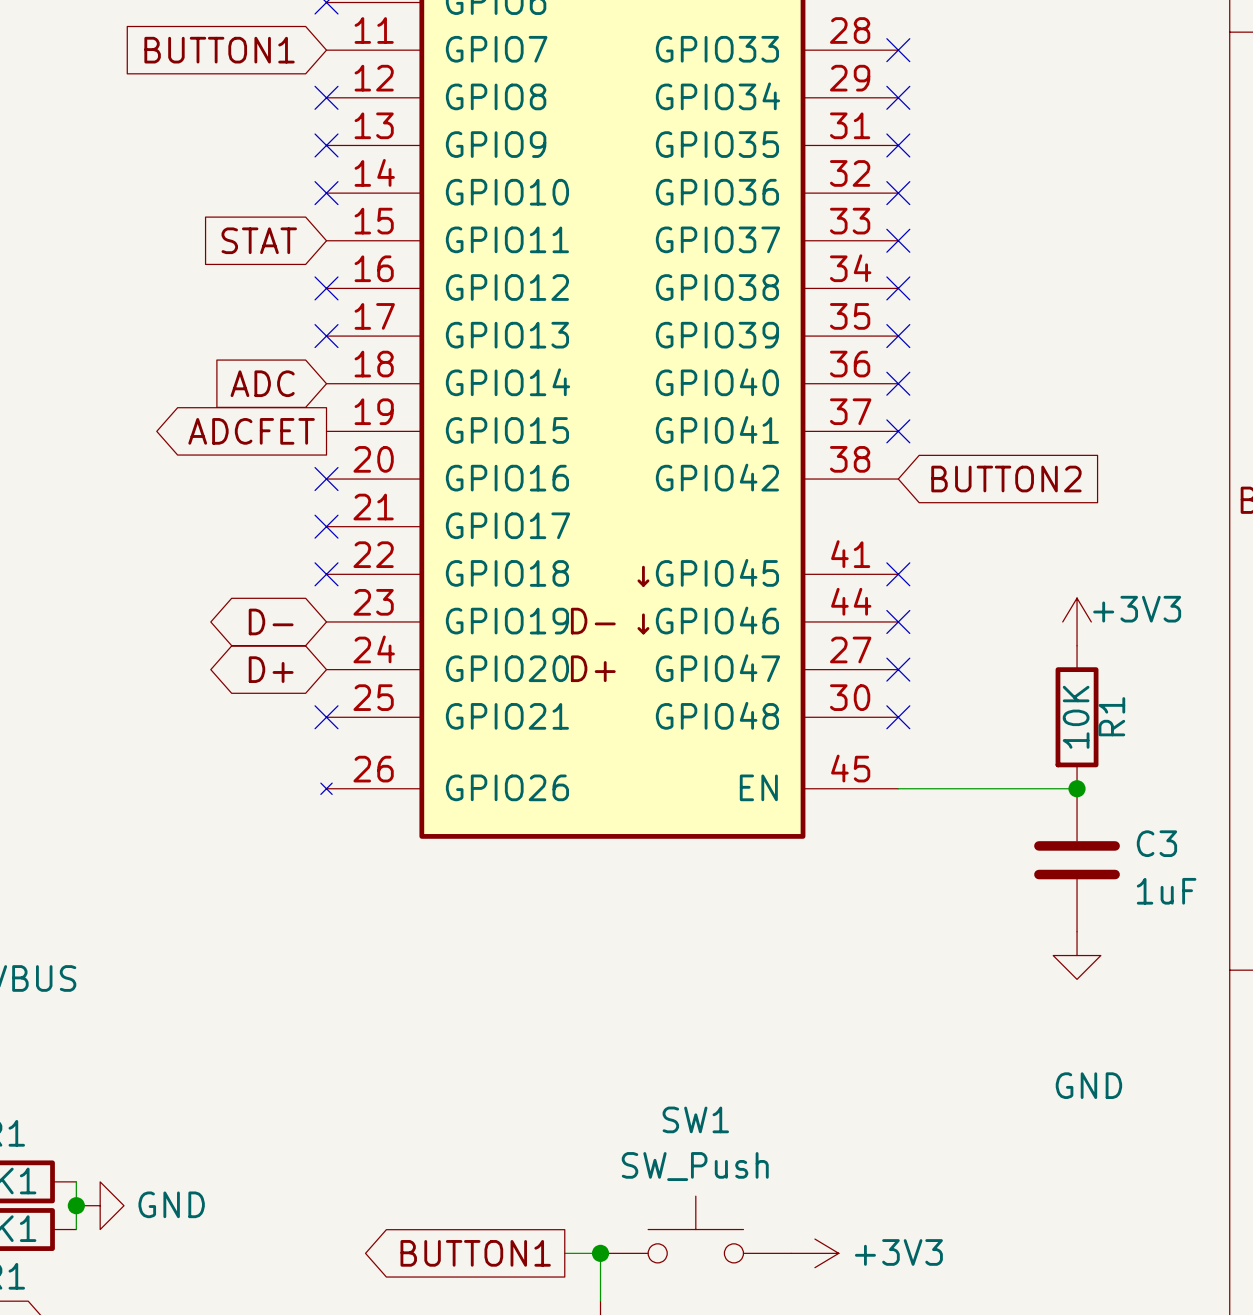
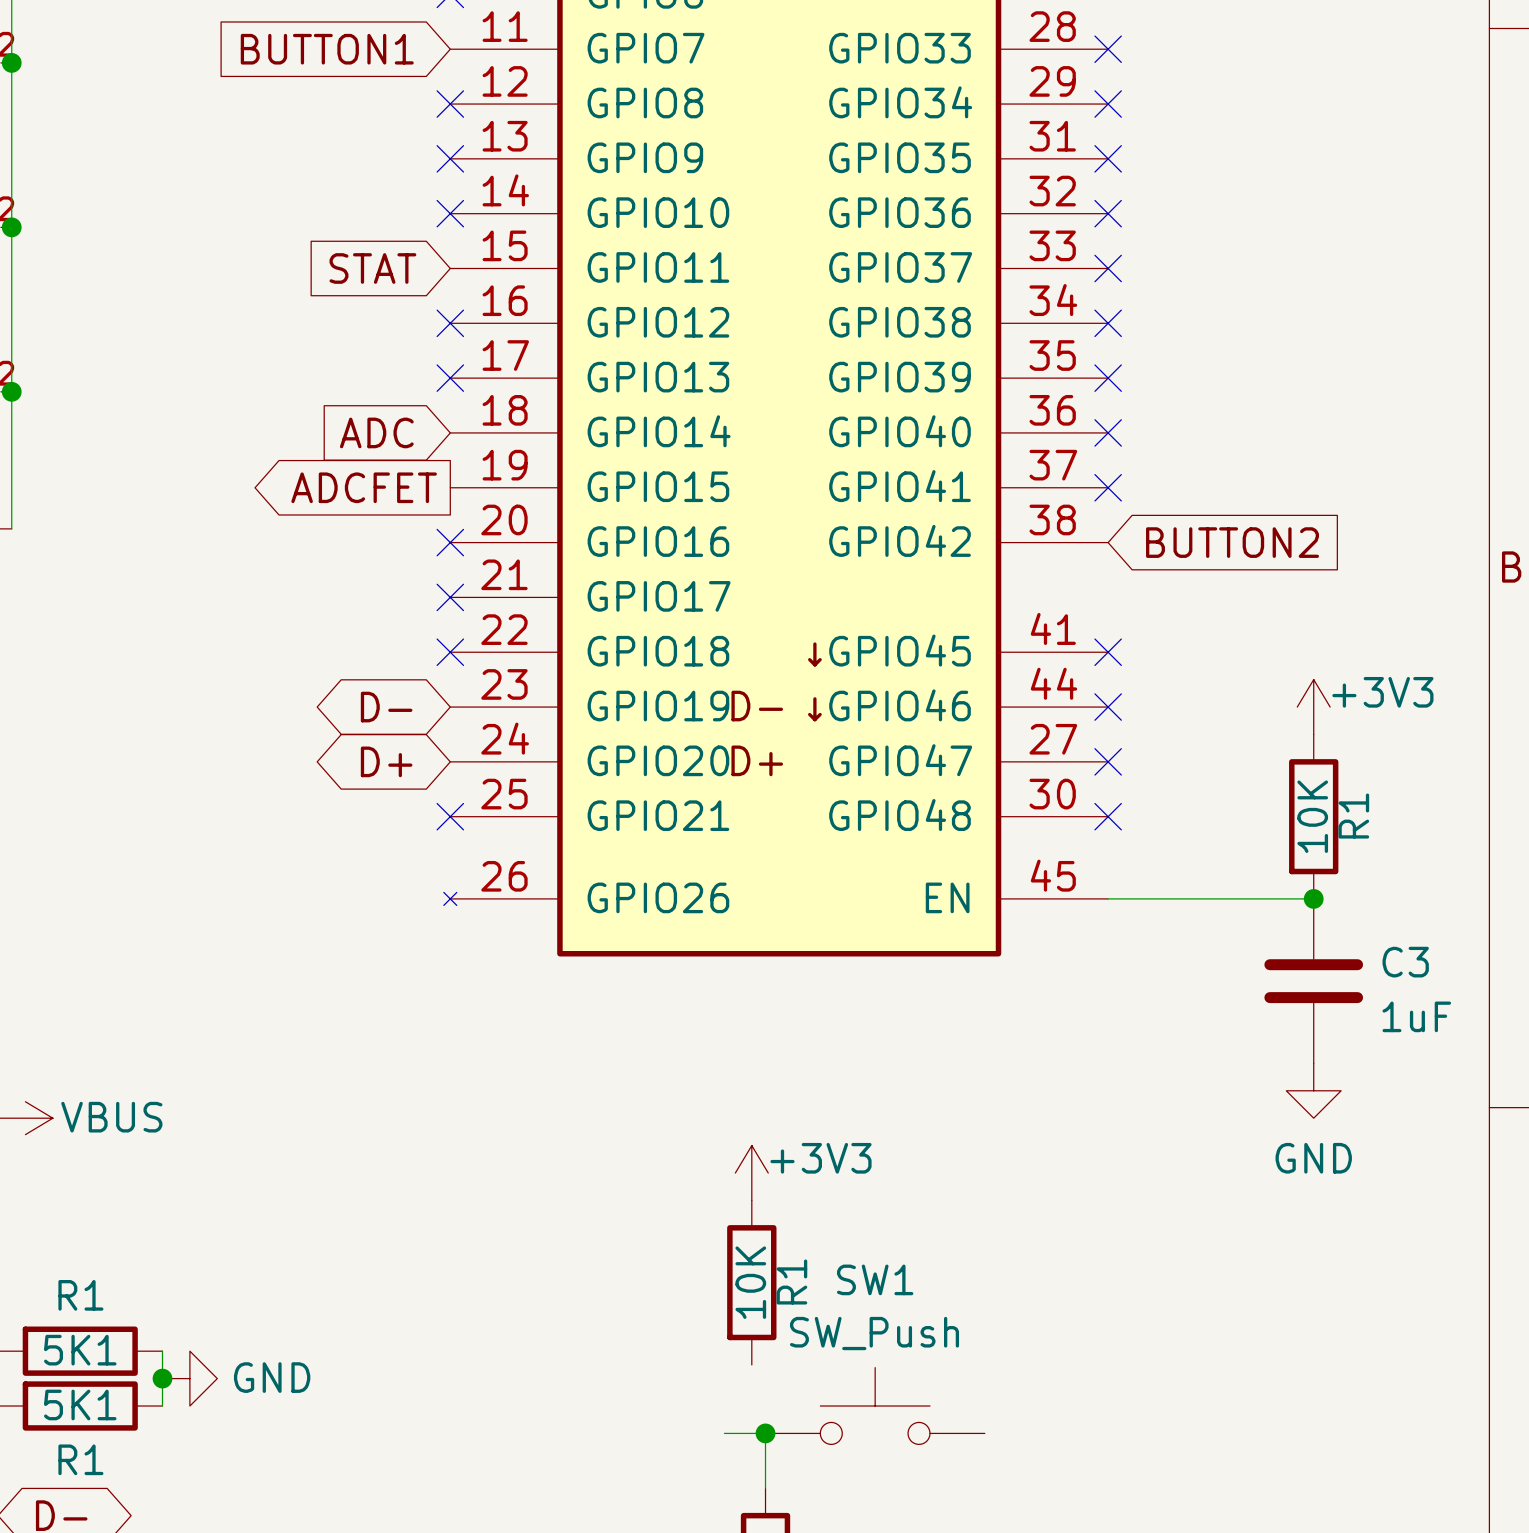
power symbol: none -> +3V3 (751, 1173)
power symbol text position: GND (1088, 1085) -> GND (1313, 1158)
R1: none -> 10K (751, 1282)
global label: BUTTON1 (475, 1253) -> none
power symbol: +3V3 (814, 1253) -> none

